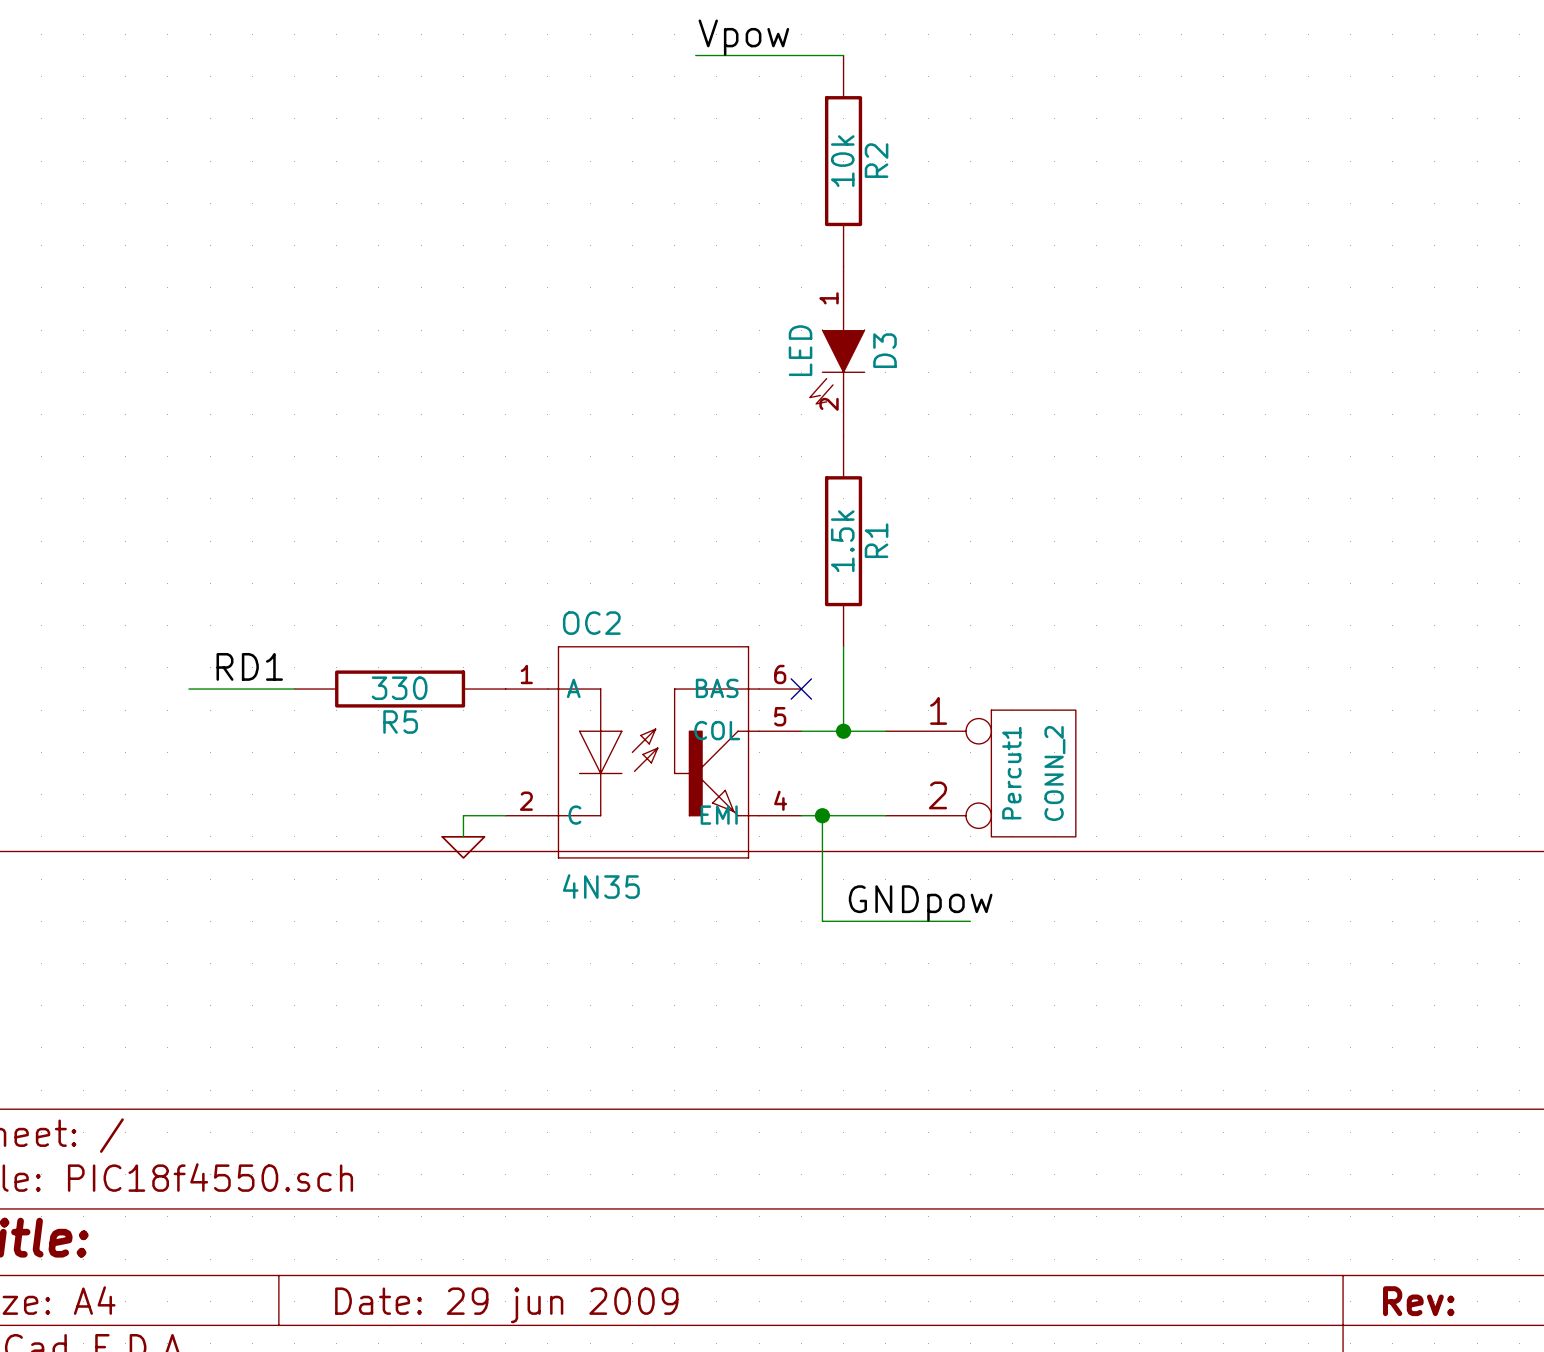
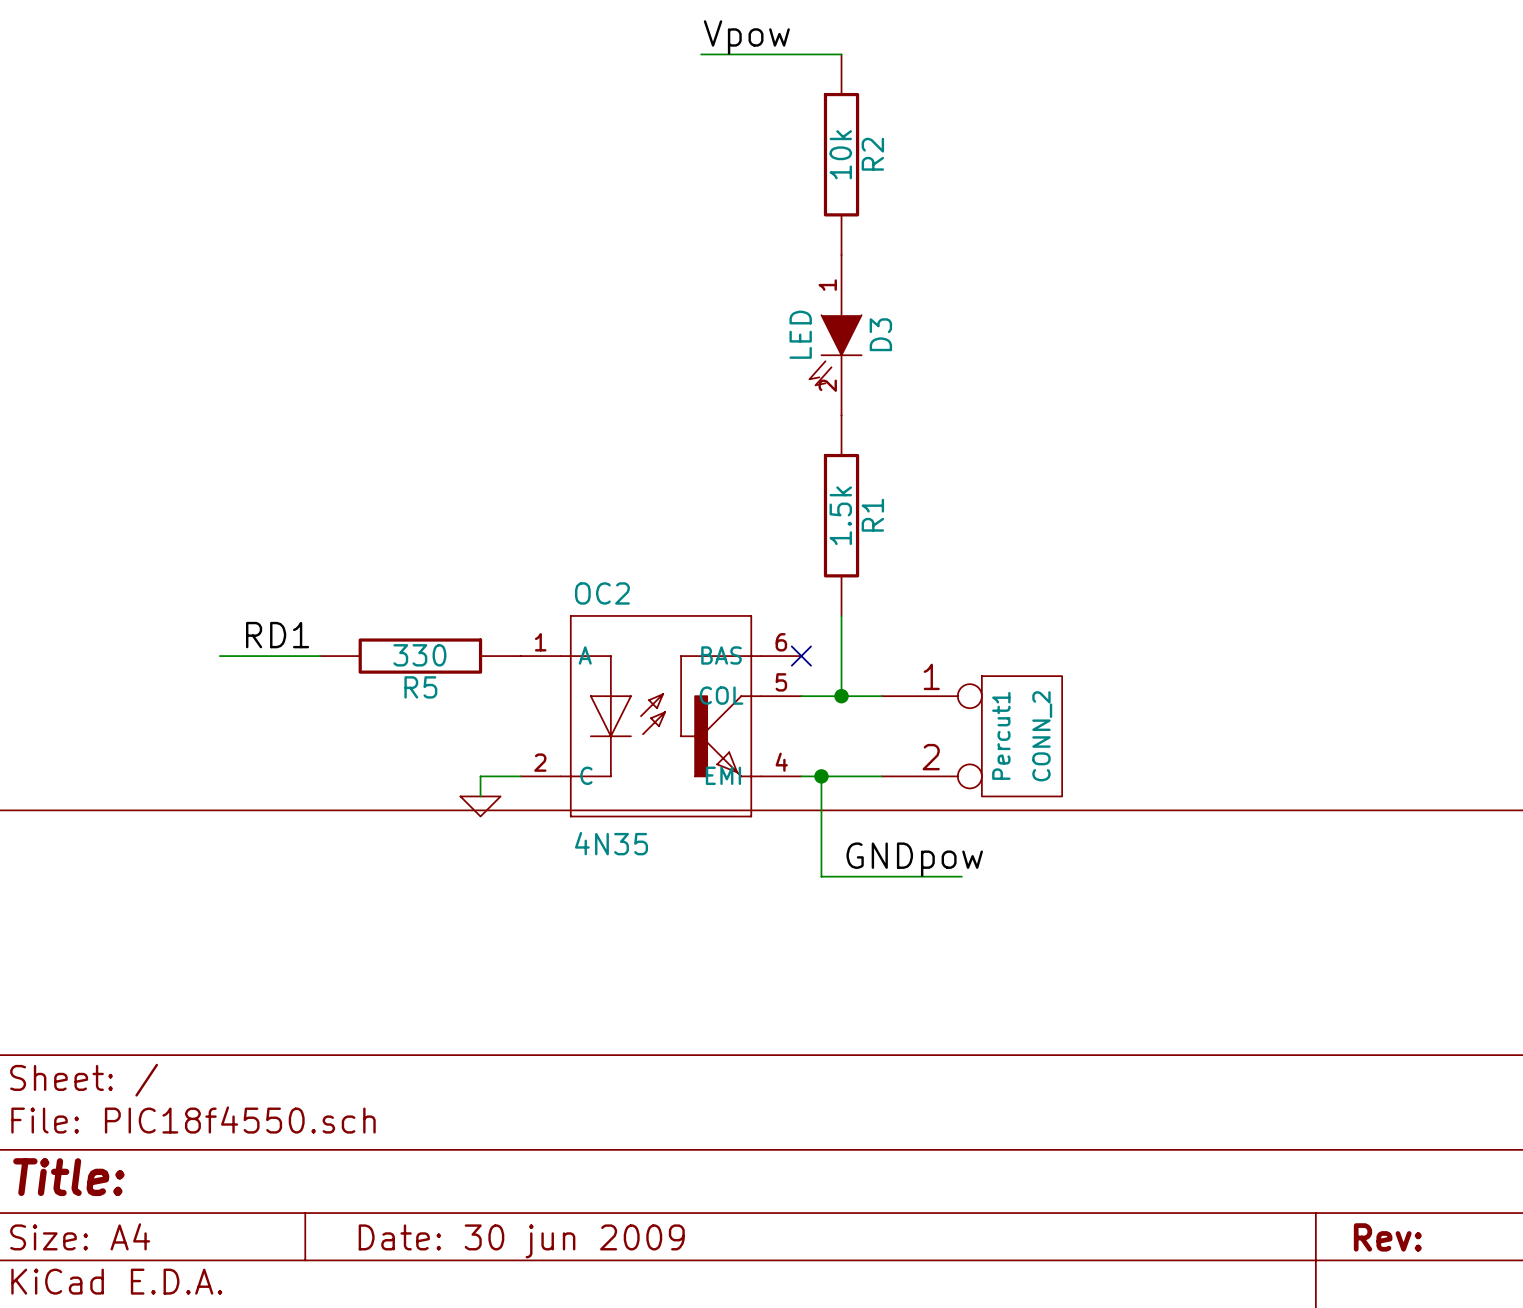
title block: Date: 29 jun 2009 (506, 1305) -> Date: 30 jun 2009 (521, 1241)

